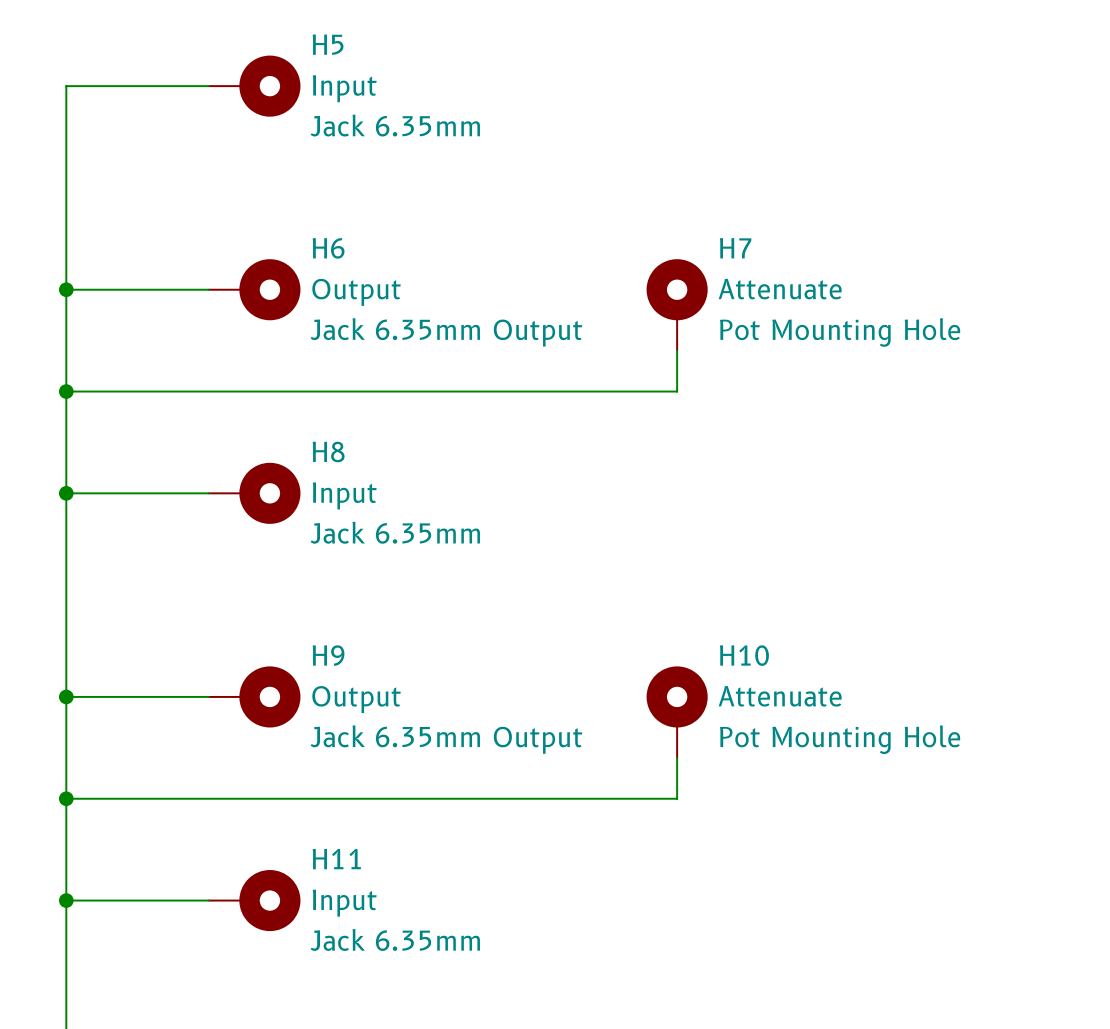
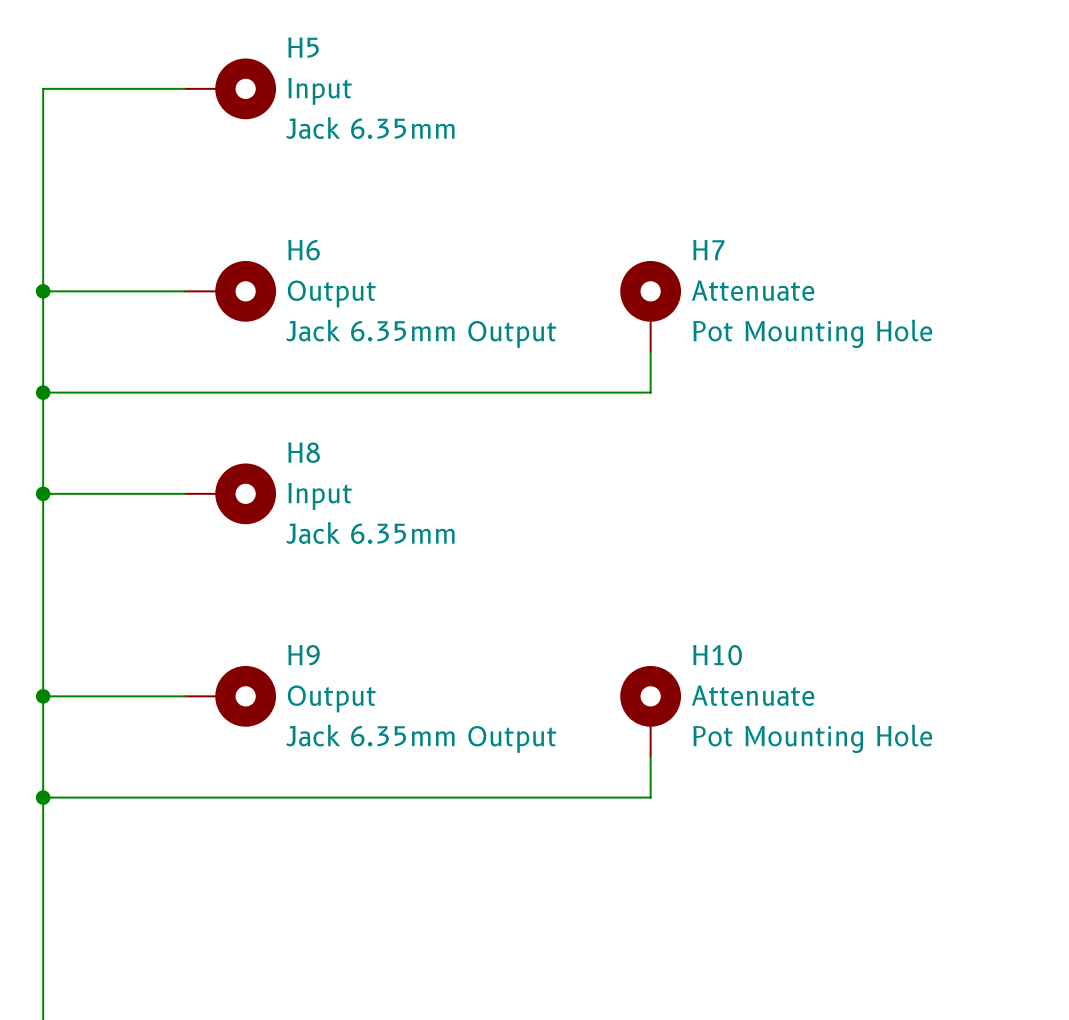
wire: (66, 900) (208, 900) -> none
junction: (66, 900) -> none
H11: Input (254, 900) -> none

